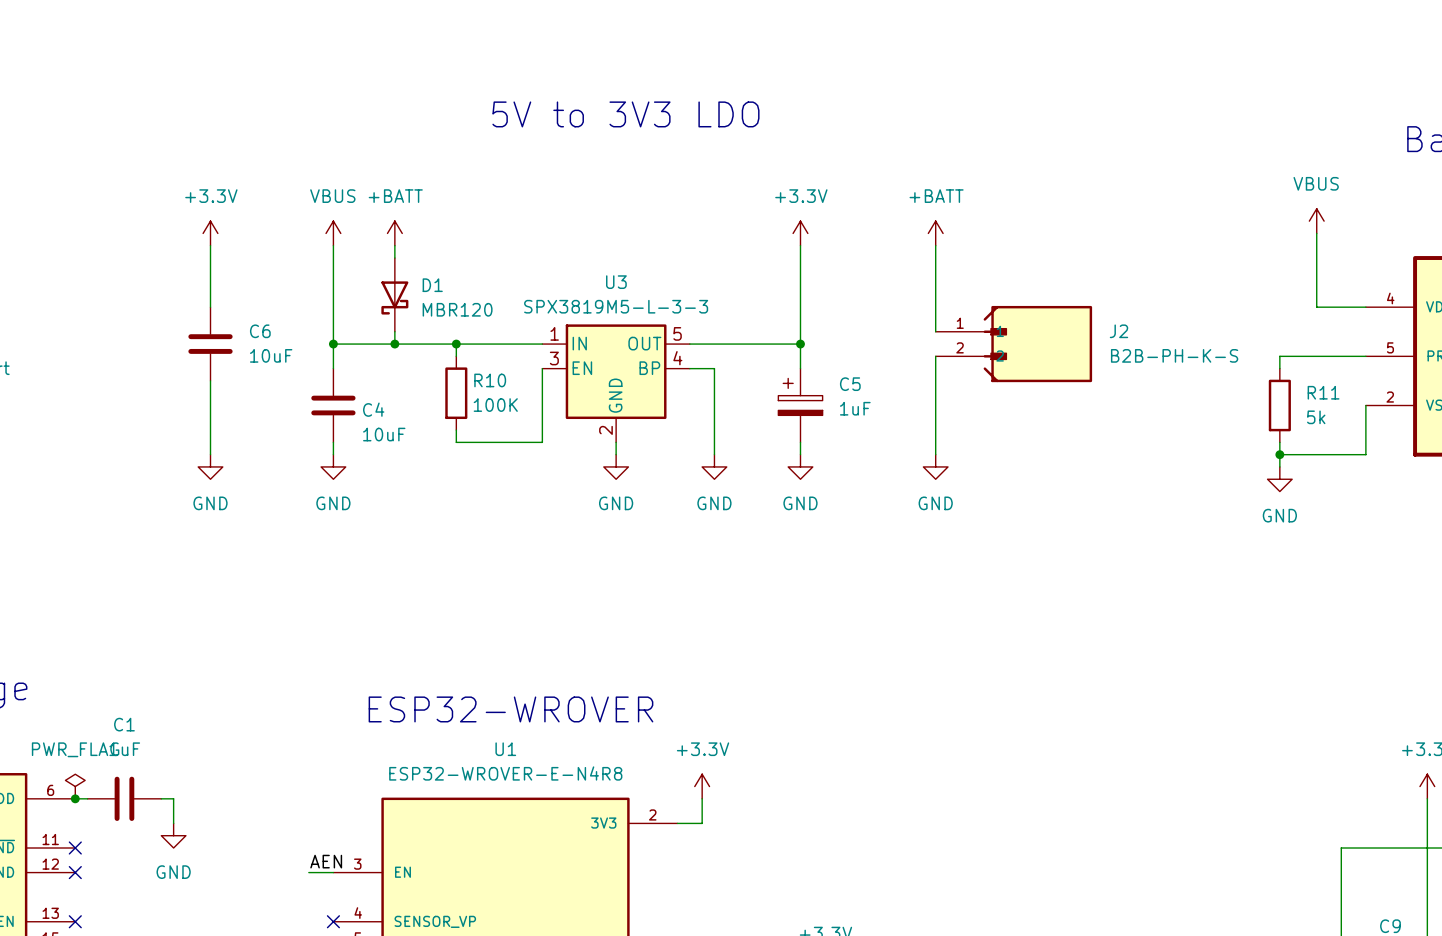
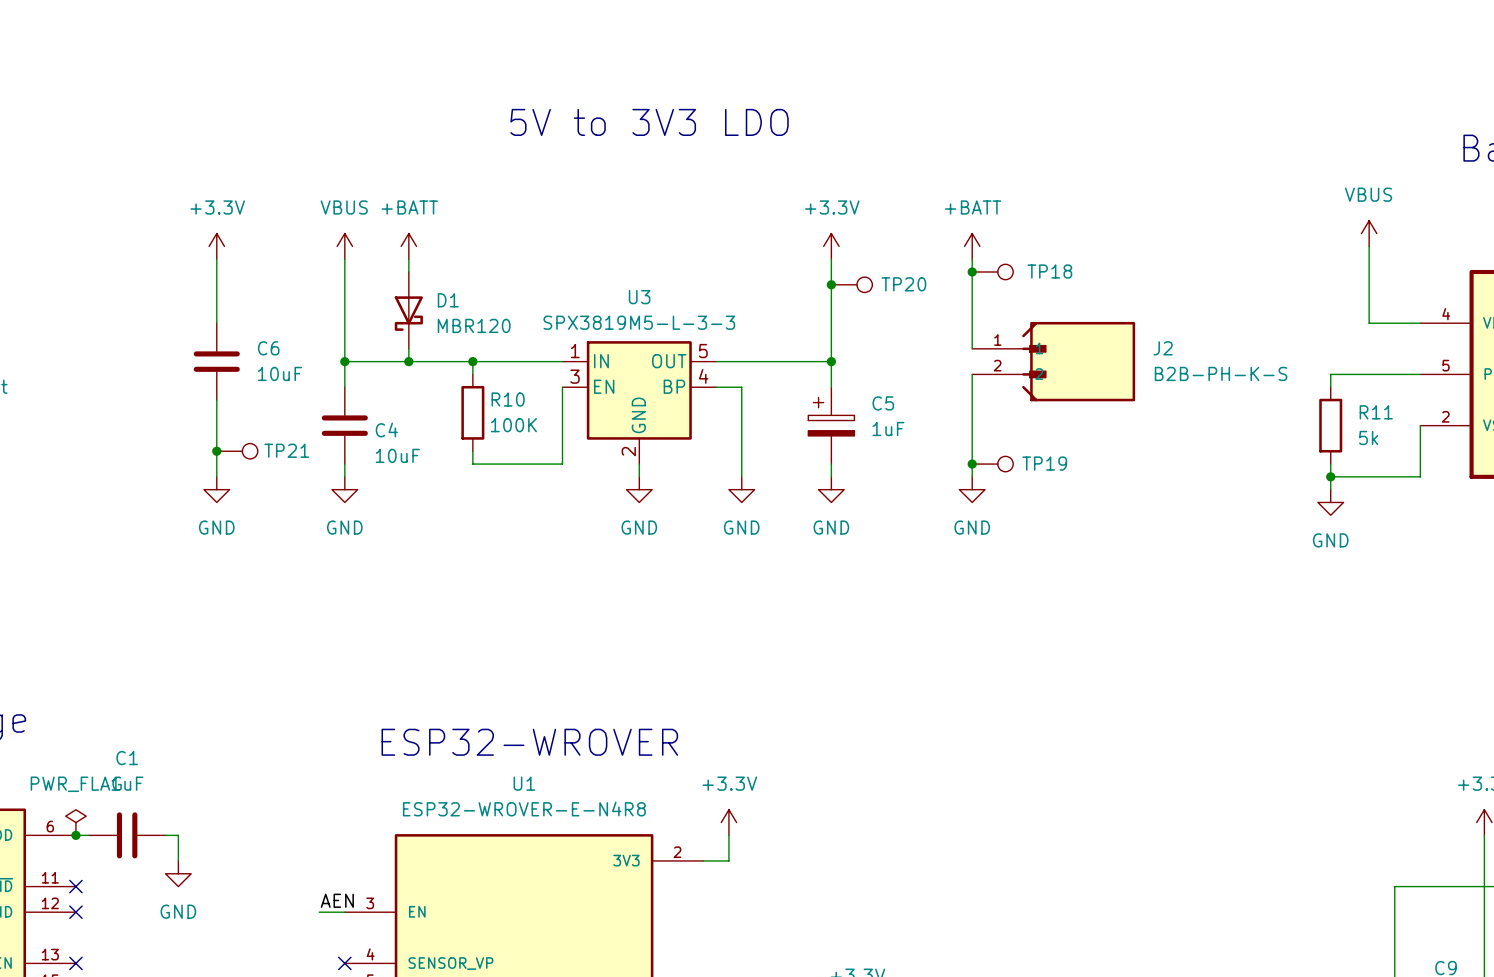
junction: none -> (972, 271)
TP18: none -> (992, 271)
junction: none -> (831, 284)
TP20: none -> (851, 284)
junction: none -> (216, 451)
TP21: none -> (237, 451)
junction: none -> (972, 464)
TP19: none -> (992, 464)

